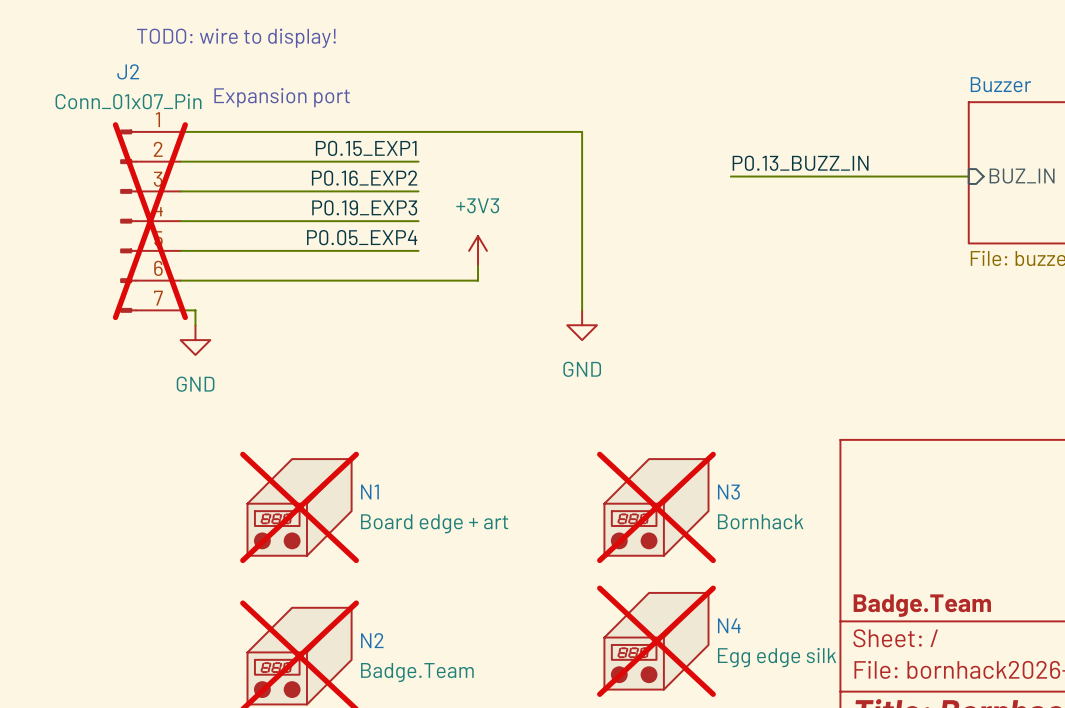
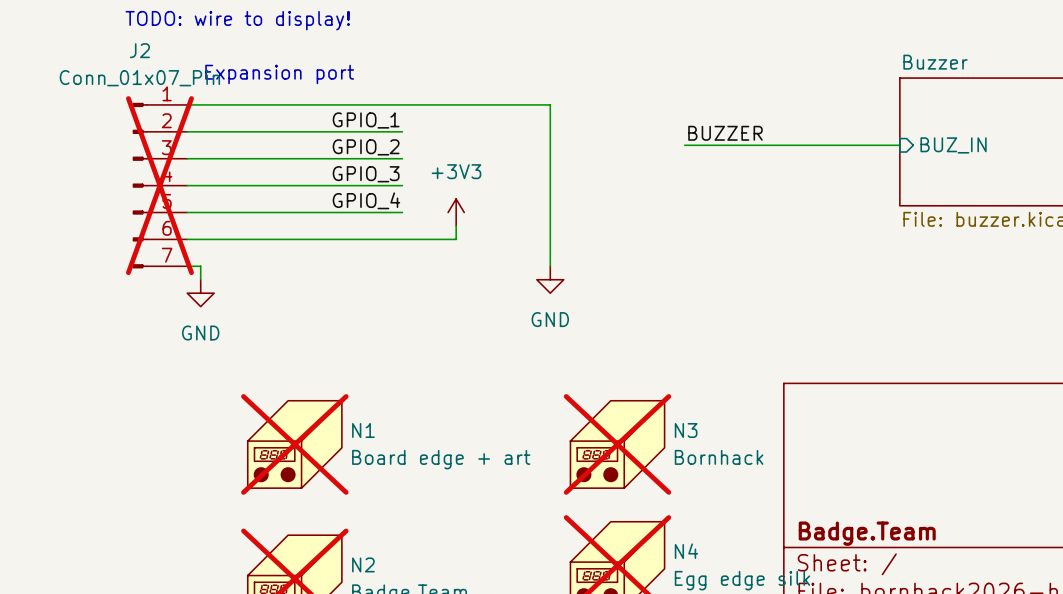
label: P0.15_EXP1 (366, 148) -> GPIO_1 (366, 120)
label: P0.13_BUZZ_IN (800, 163) -> BUZZER (725, 133)
label: P0.16_EXP2 (364, 178) -> GPIO_2 (366, 147)
label: P0.19_EXP3 (364, 207) -> GPIO_3 (366, 174)
label: P0.05_EXP4 (362, 237) -> GPIO_4 (366, 200)

